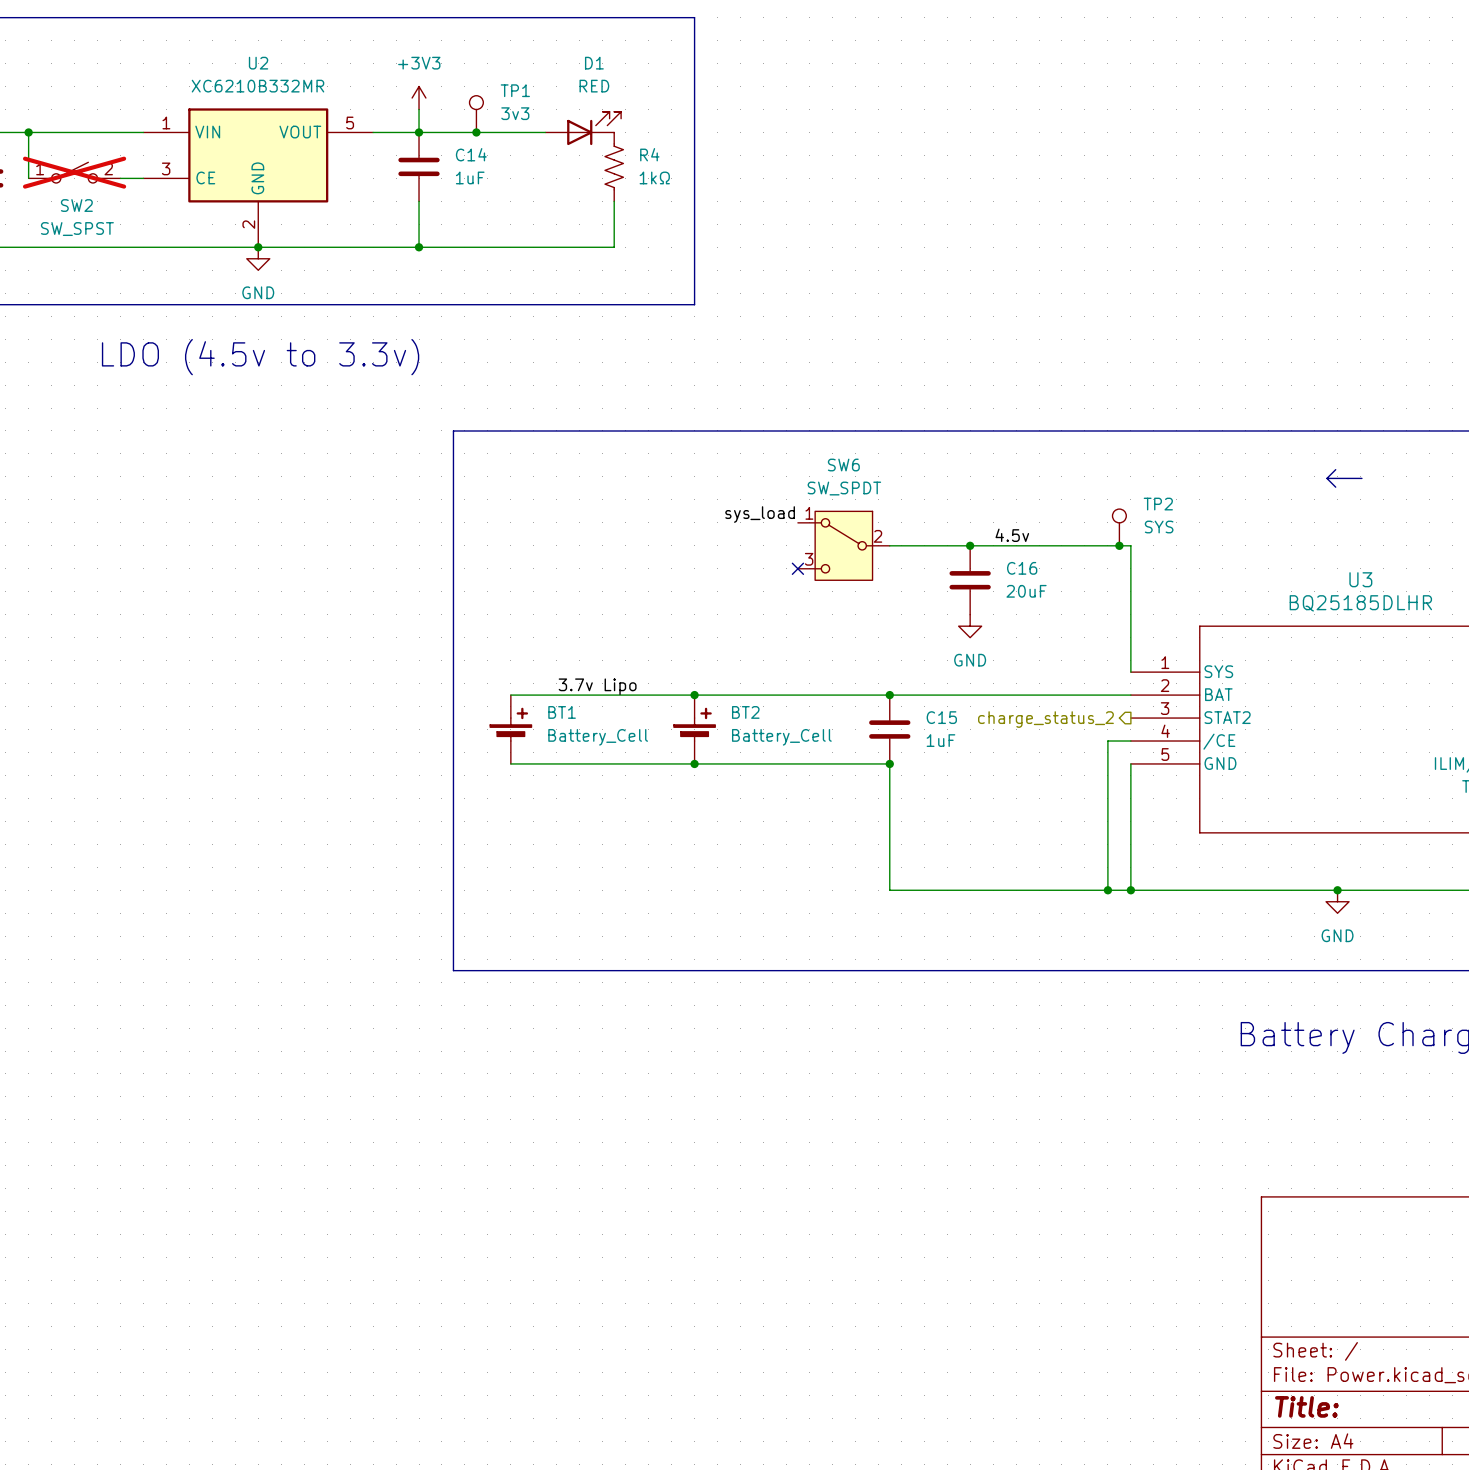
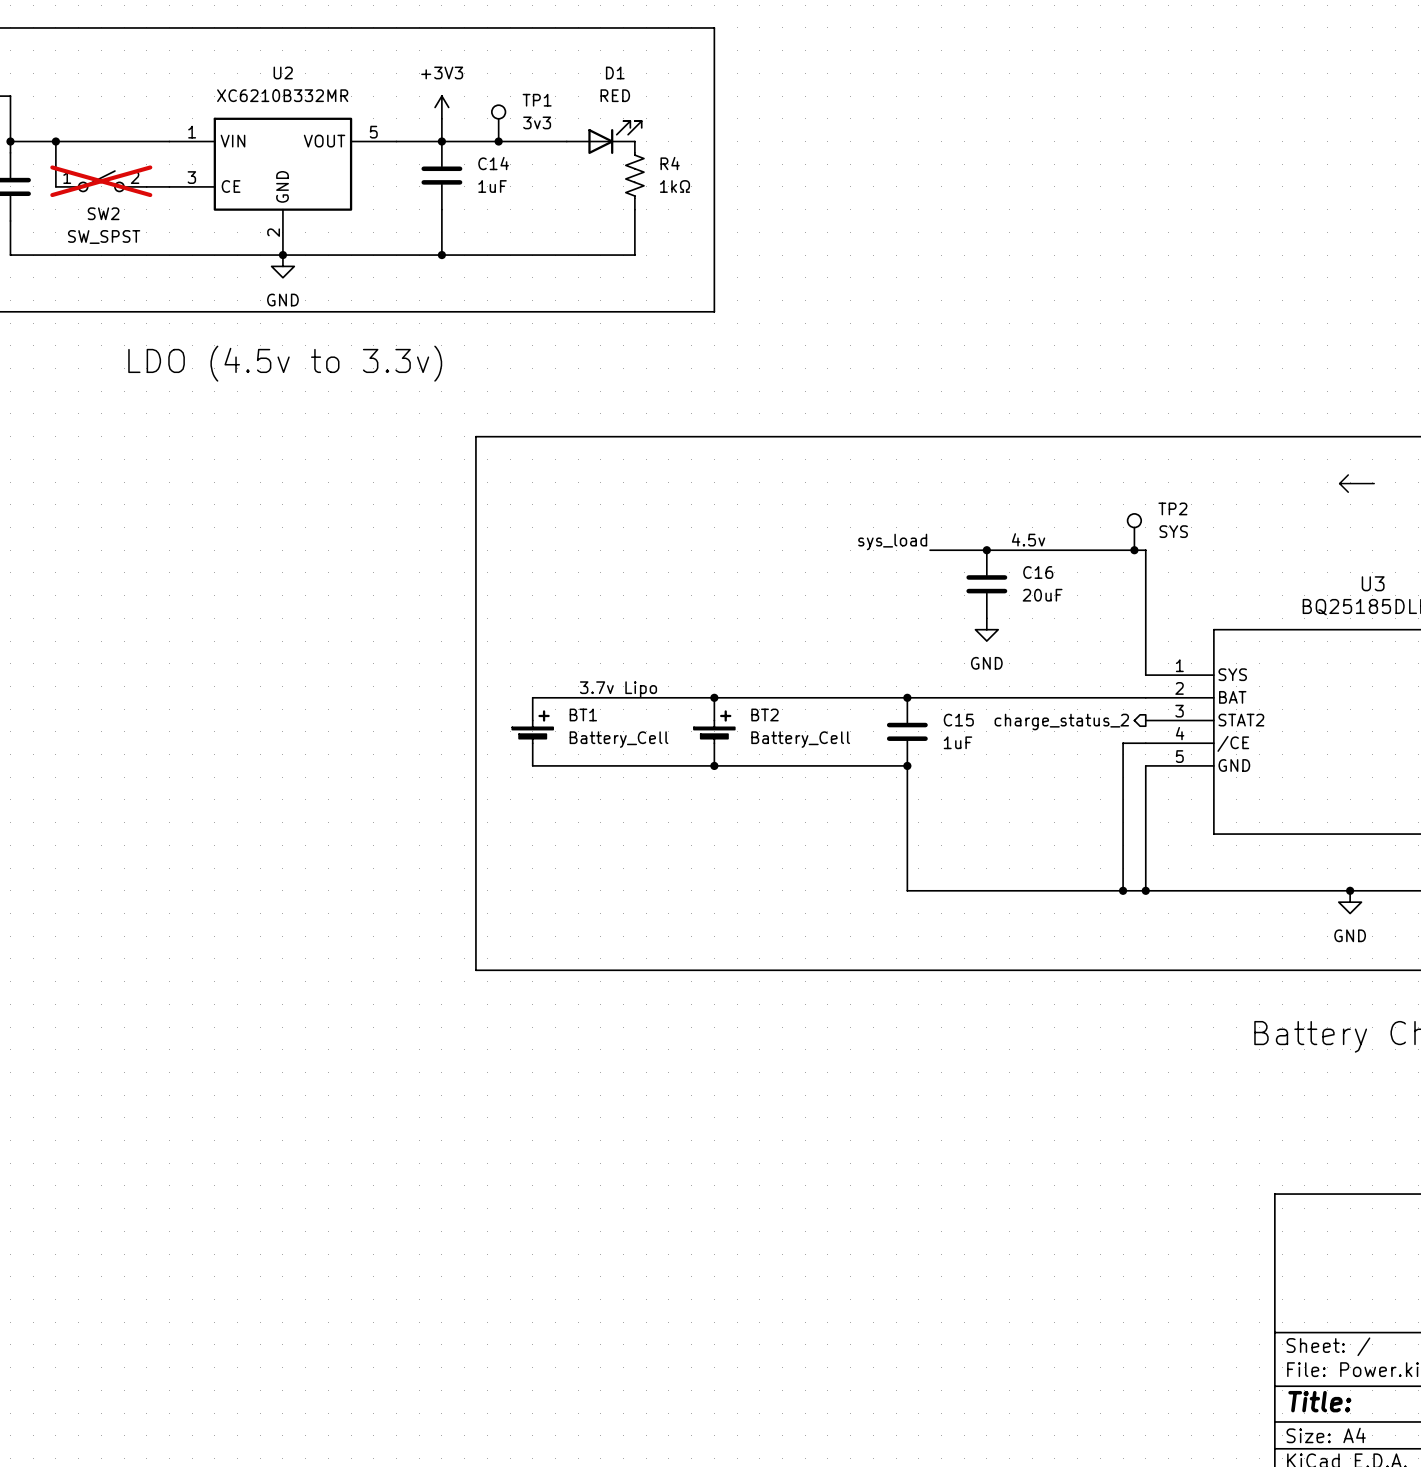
label position: sys_load (760, 514) -> sys_load (892, 541)
SW6: SW_SPDT (843, 545) -> none
wire: (889, 545) (912, 545) -> none
no-connect mark: (797, 568) -> none

